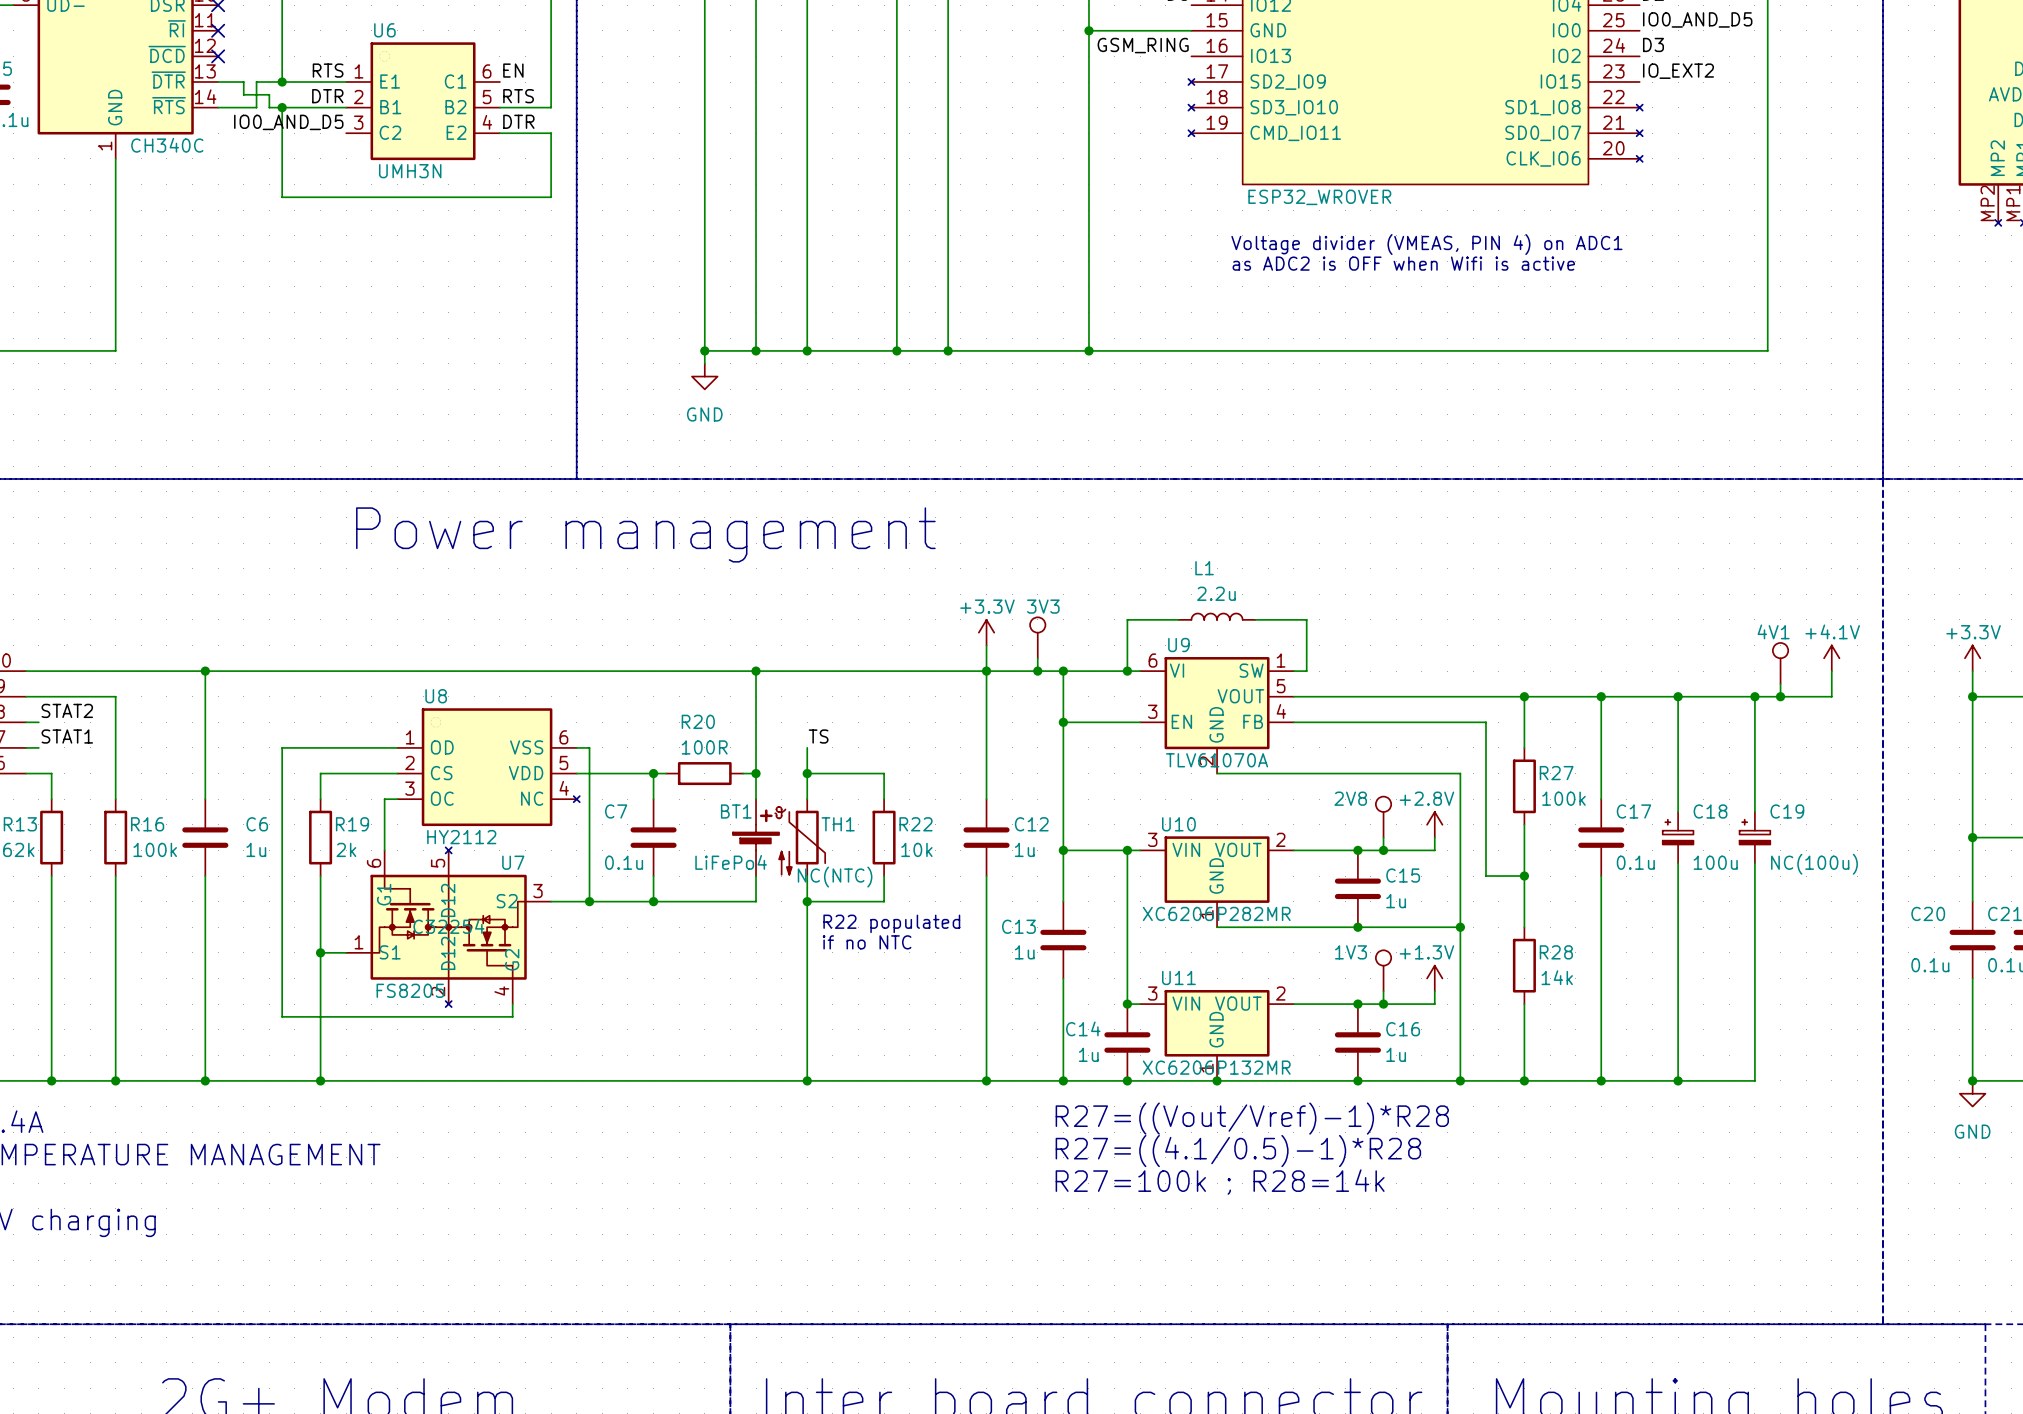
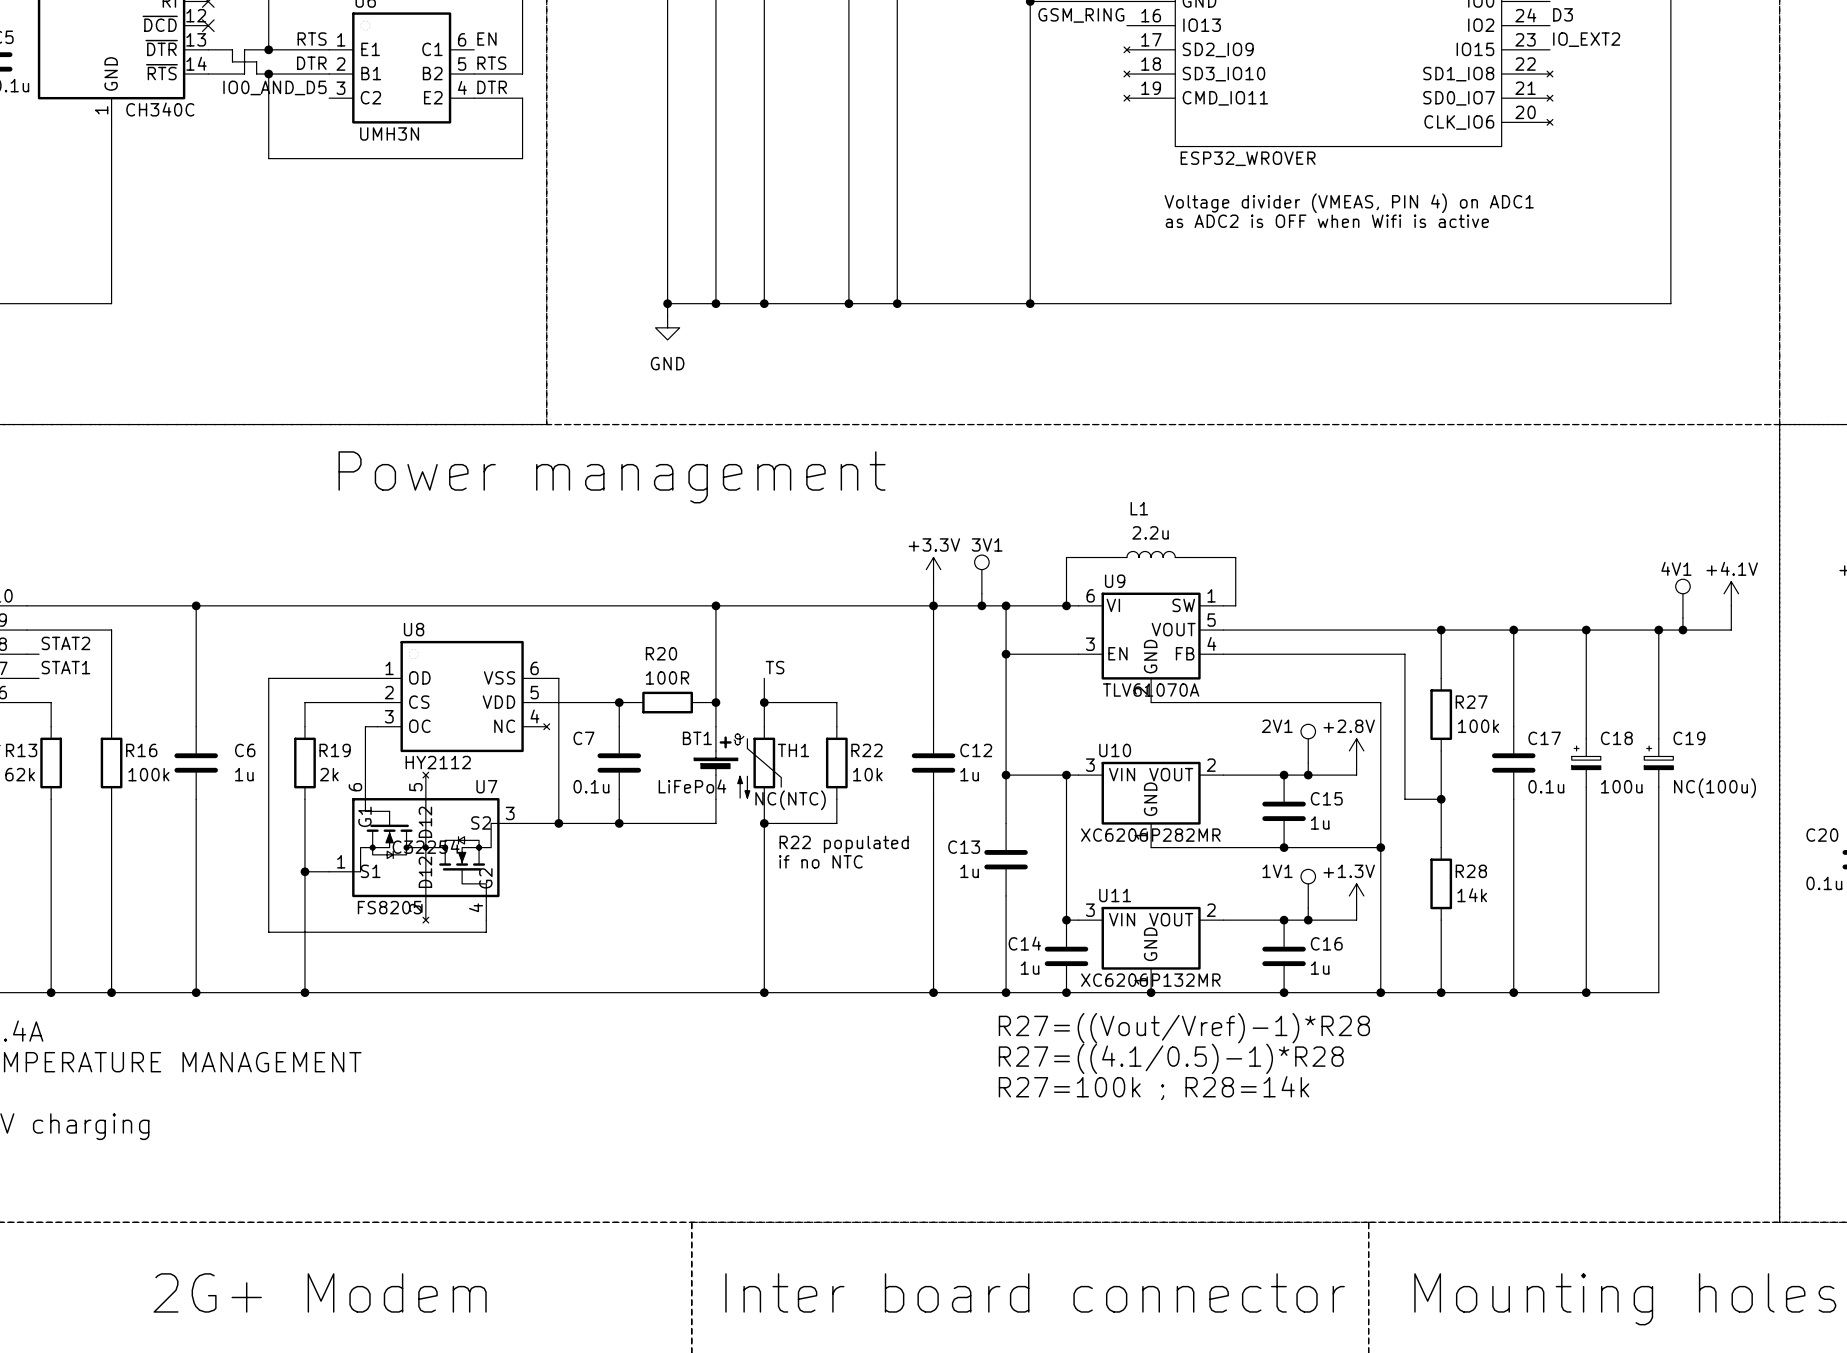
3V3 name: 3V3 (1043, 606) -> 3V1 (987, 544)
2V8 name: 2V8 (1350, 798) -> 2V1 (1277, 726)
1V3 name: 1V3 (1351, 952) -> 1V1 (1277, 871)

